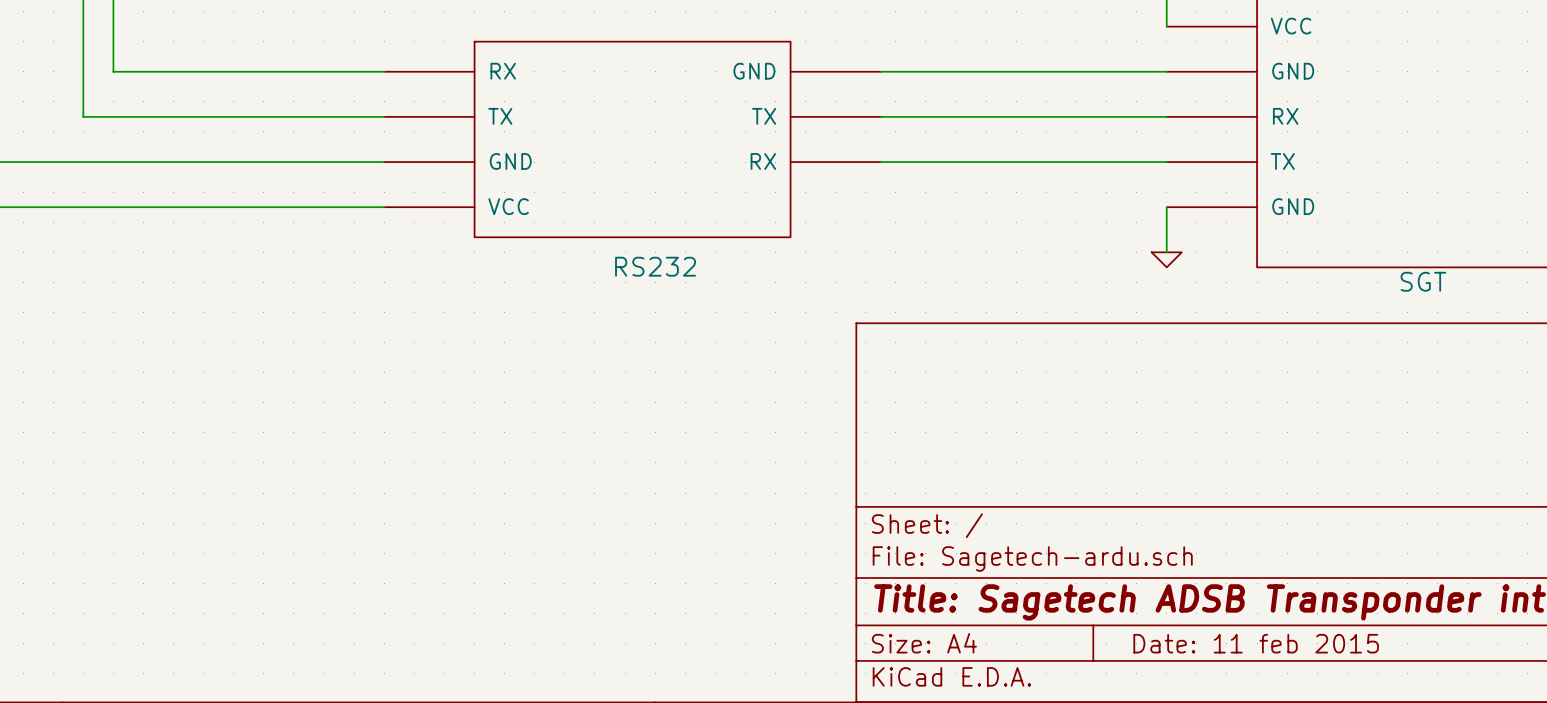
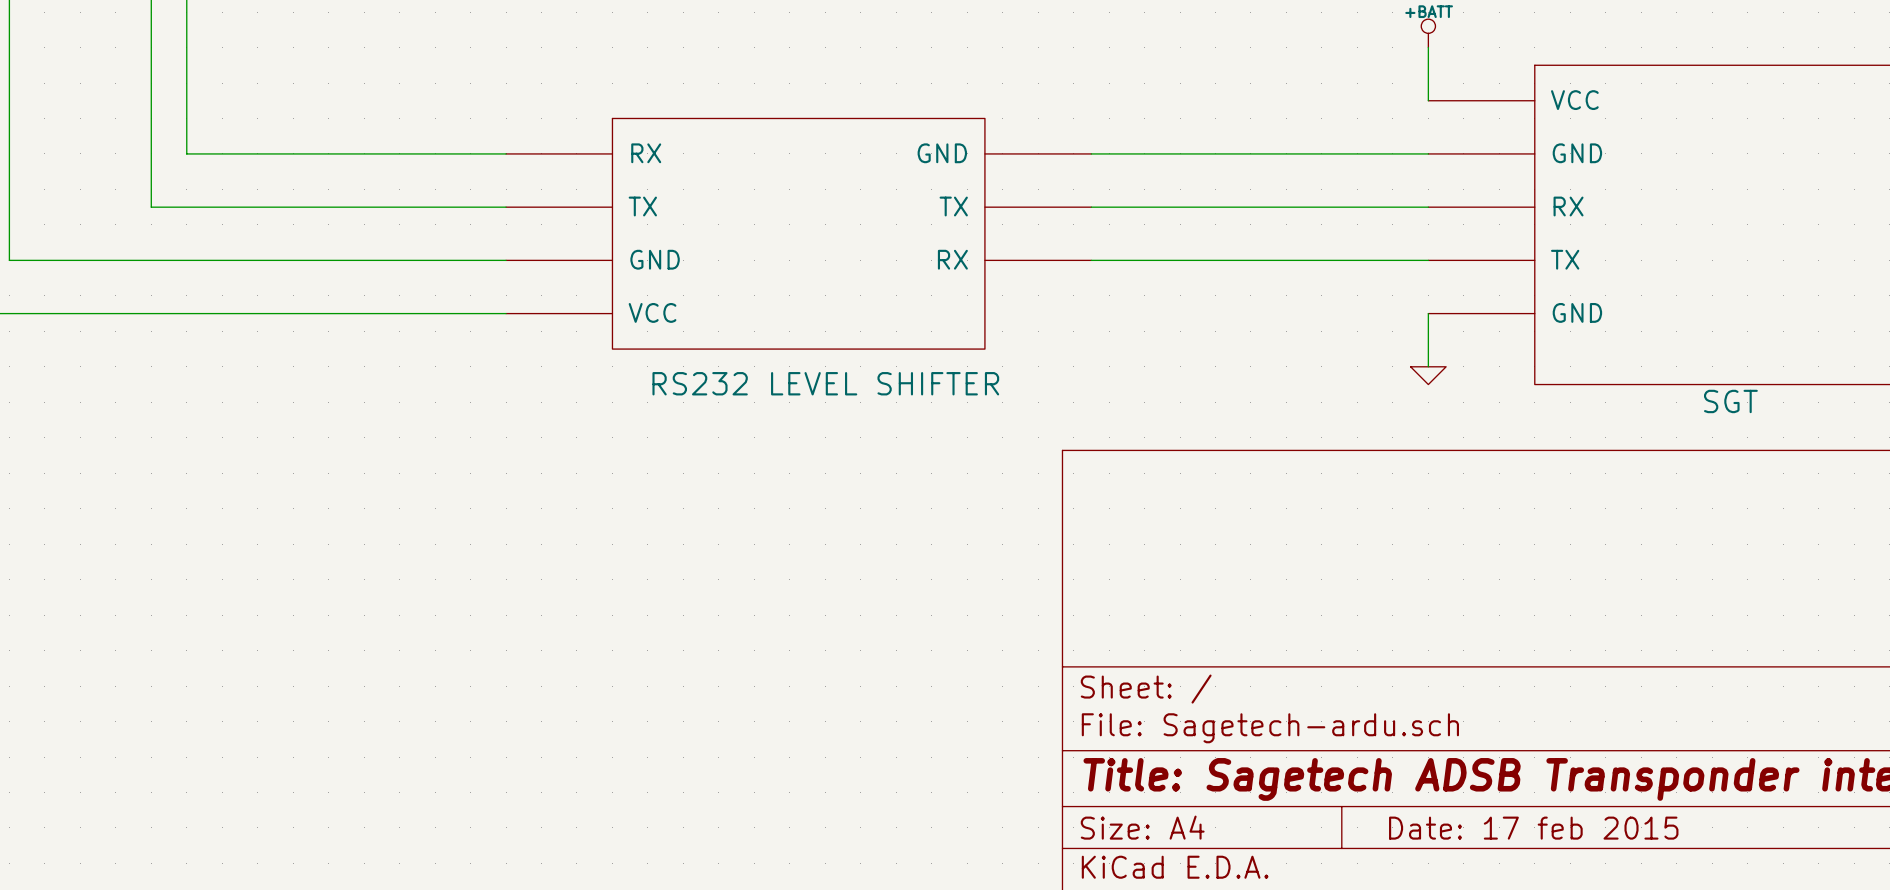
RS232 name: RS232 (655, 266) -> RS232 LEVEL SHIFTER (825, 383)
title block: Date: 11 feb 2015 (1256, 643) -> Date: 17 feb 2015 (1533, 828)

